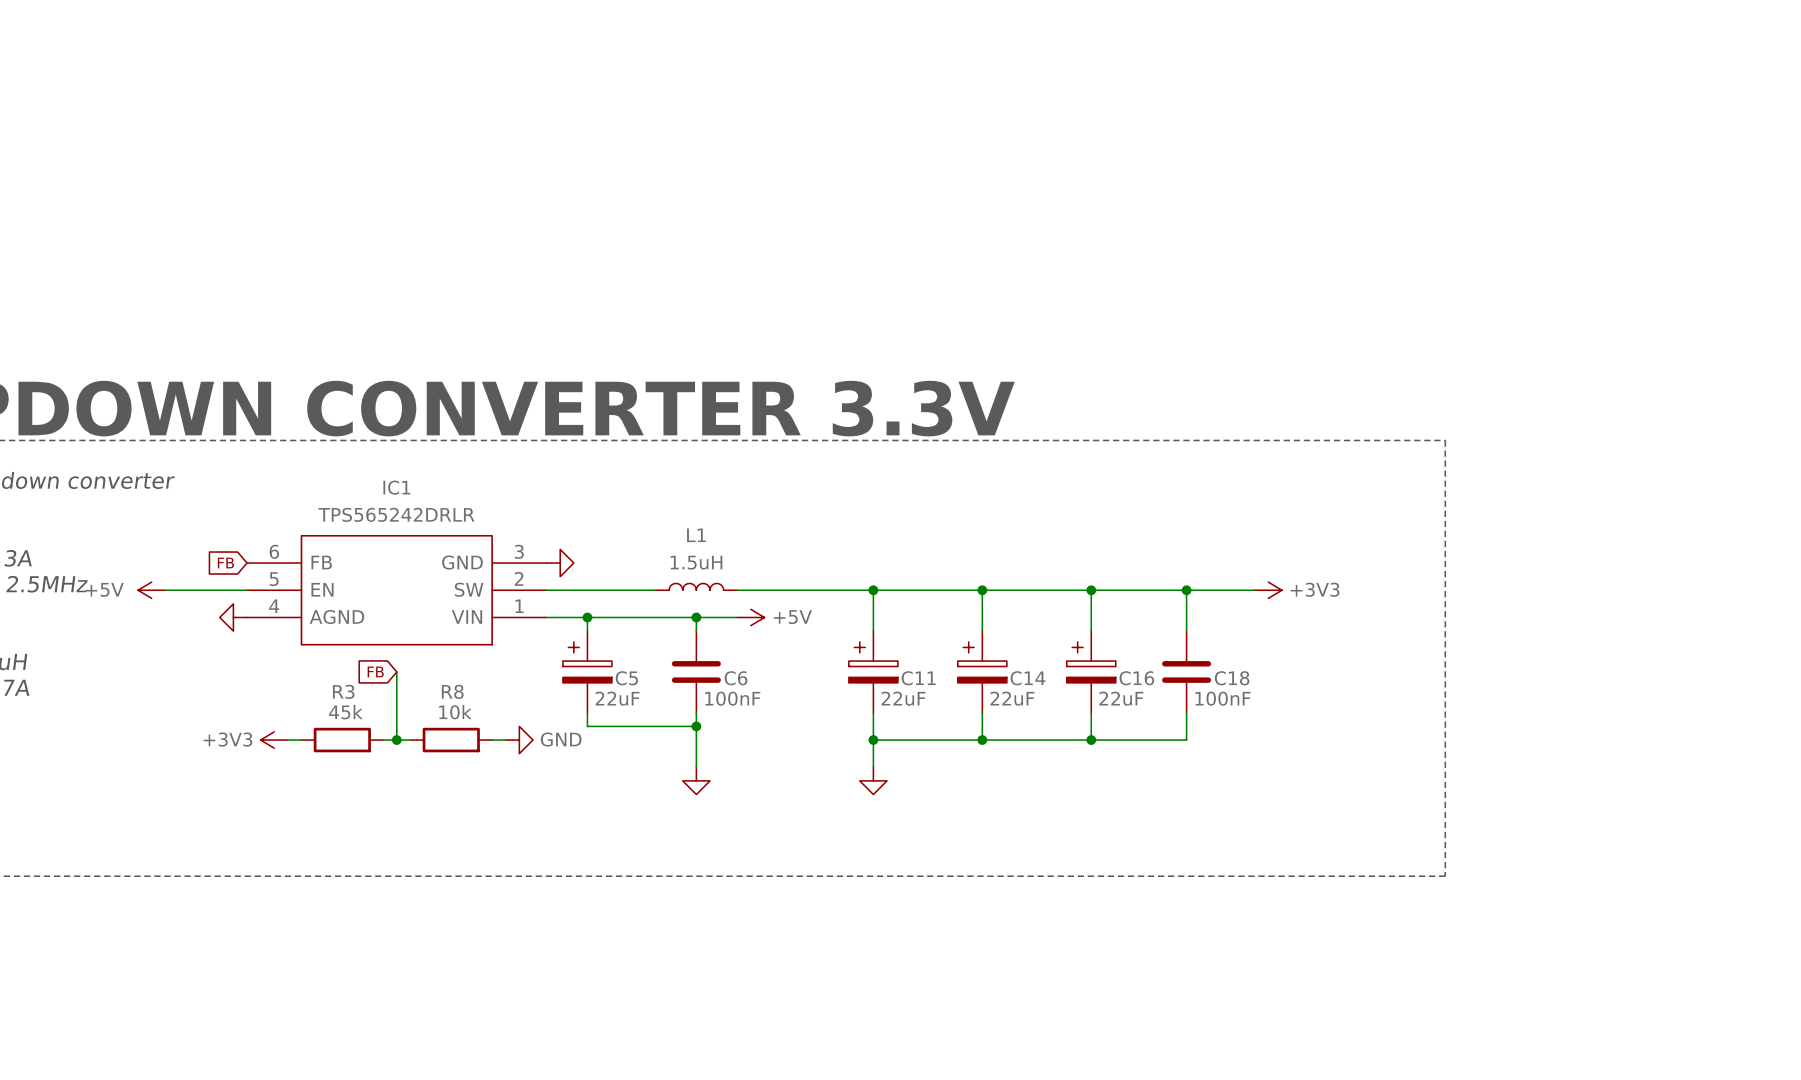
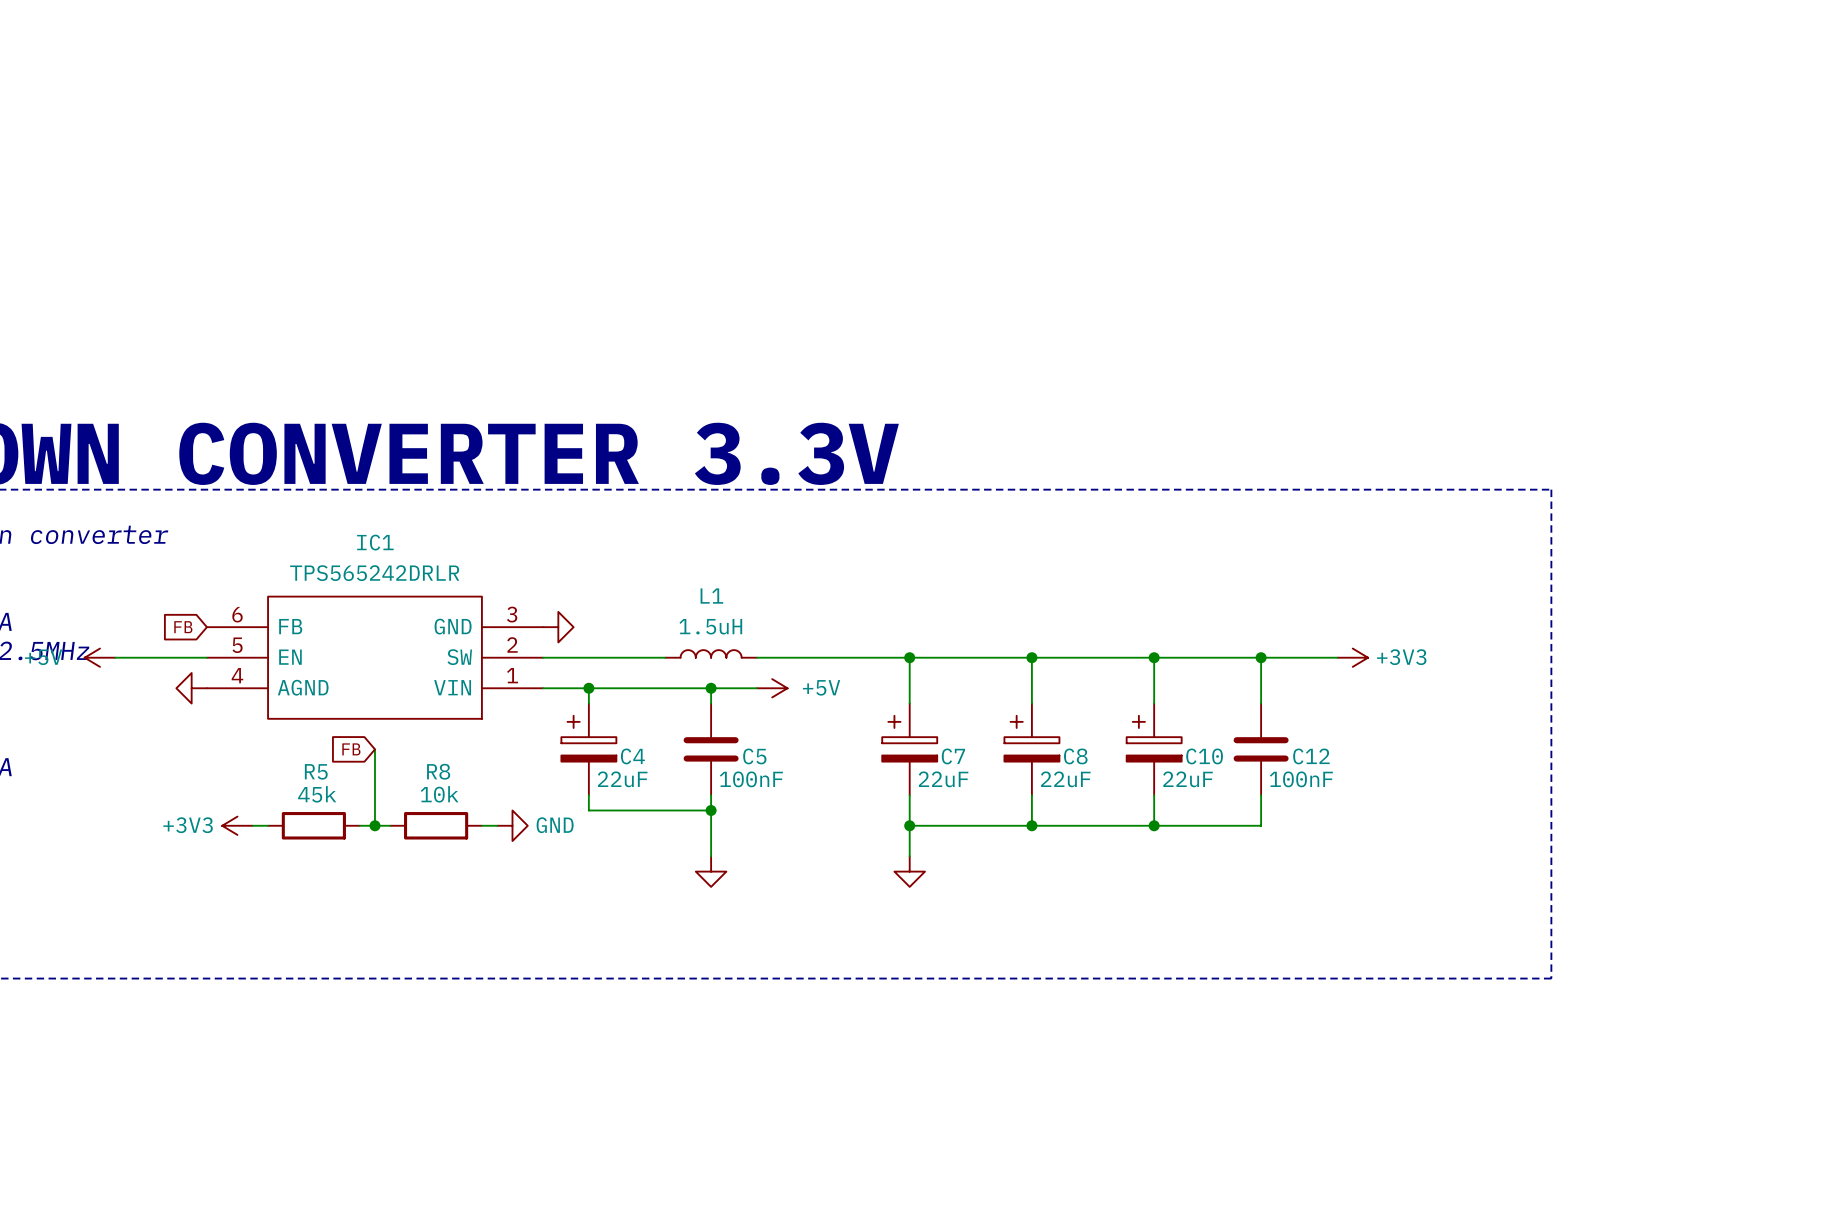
C5 name: C5 (626, 678) -> C4 (632, 756)
C6 name: C6 (736, 678) -> C5 (754, 756)
C11 name: C11 (918, 678) -> C7 (953, 756)
C14 name: C14 (1027, 678) -> C8 (1075, 756)
C16 name: C16 (1136, 678) -> C10 (1204, 756)
C18 name: C18 (1232, 678) -> C12 (1311, 756)
R3 name: R3 (343, 691) -> R5 (316, 771)

